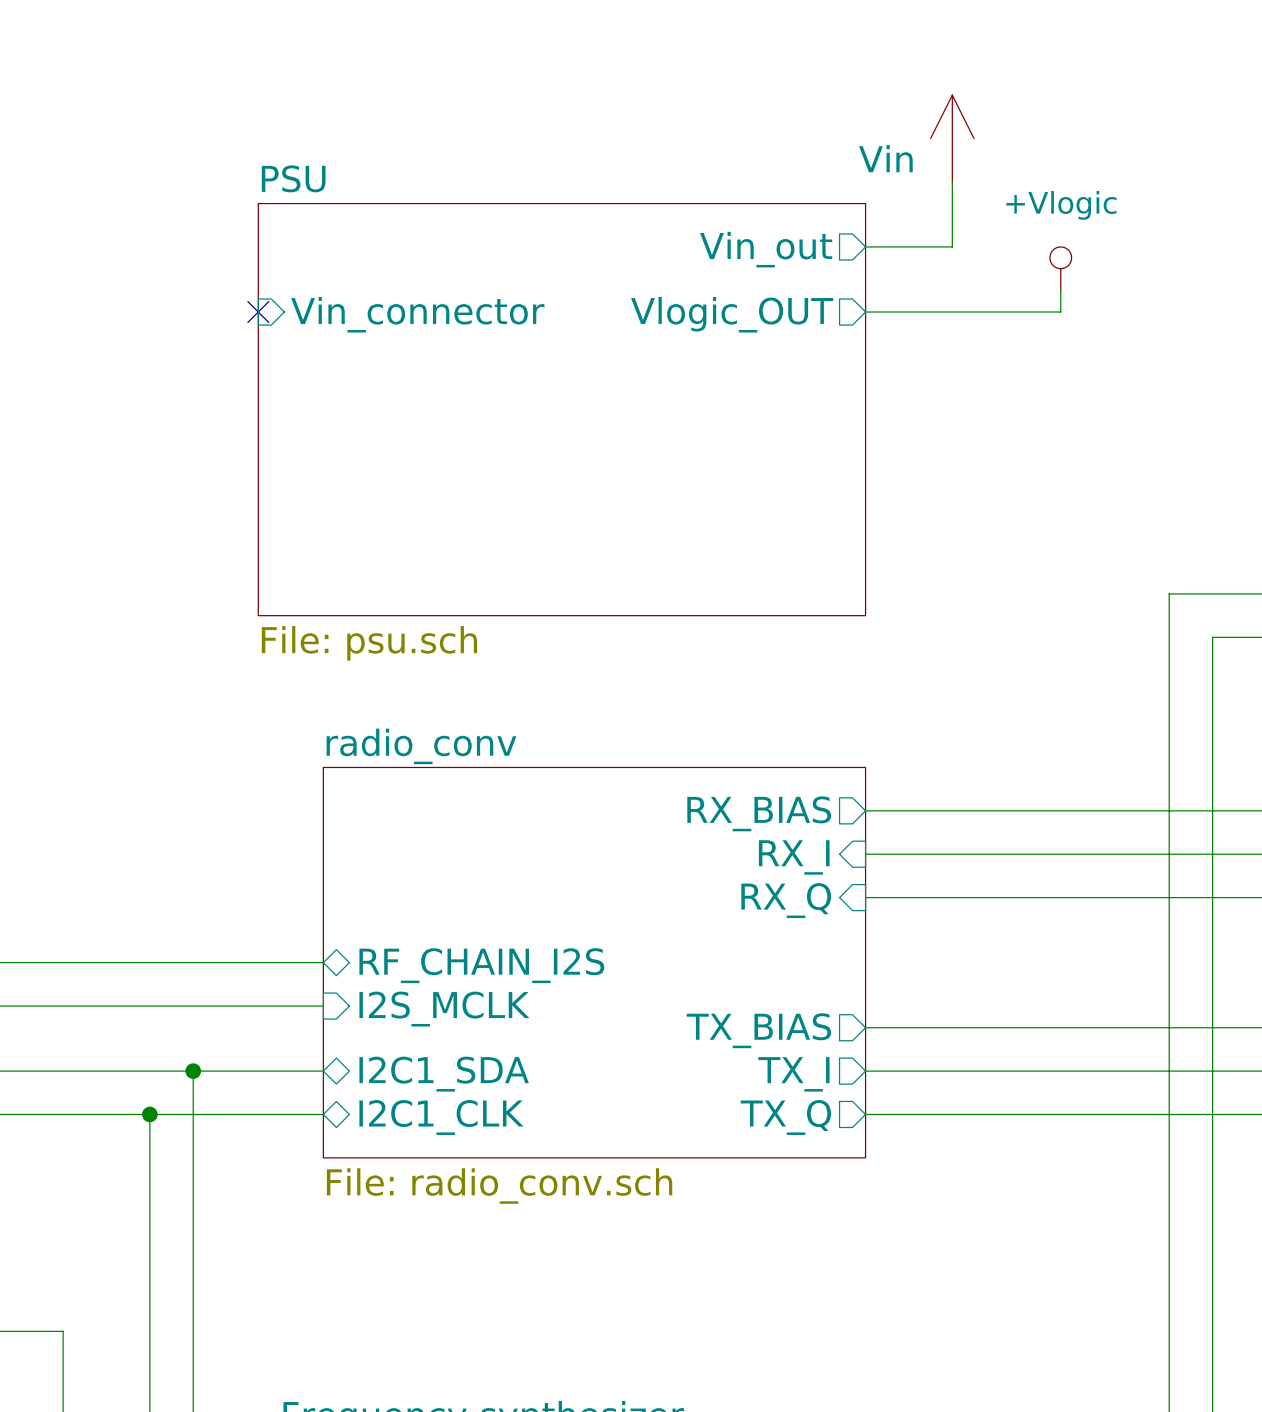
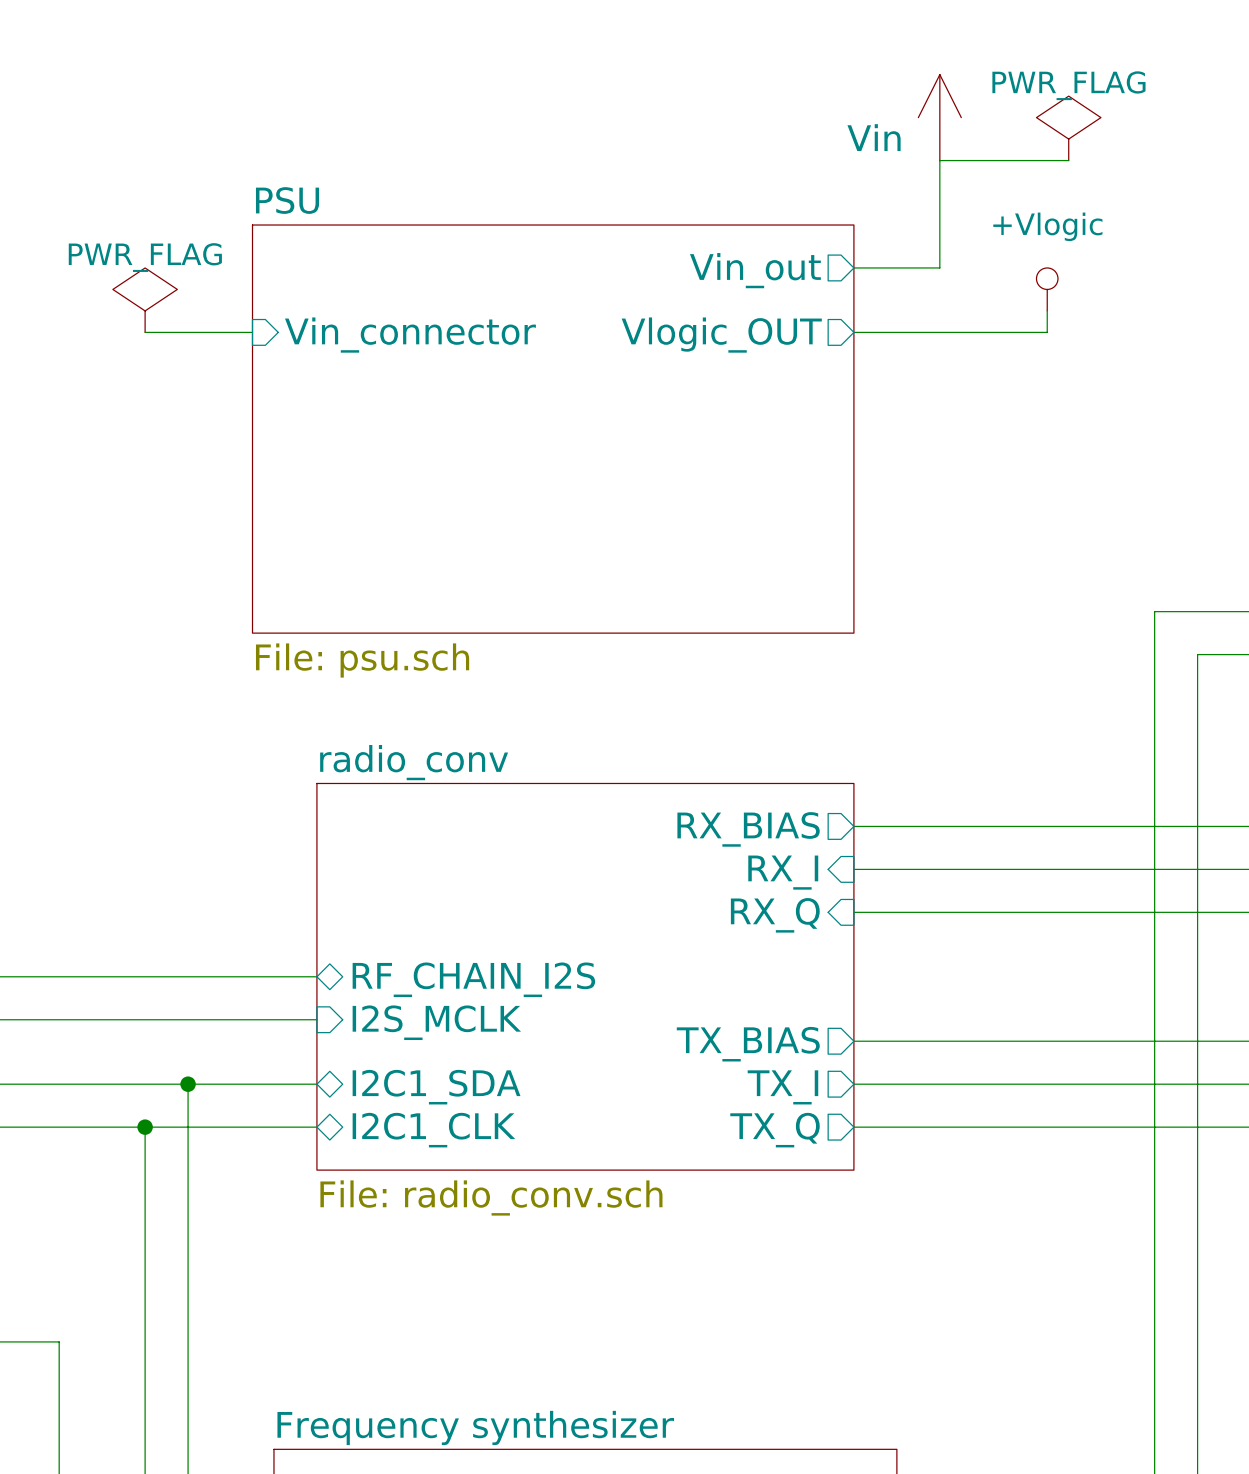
power symbol: none -> PWR_FLAG (1068, 128)
power symbol position: Vin (952, 138) -> Vin (939, 117)
wire: none -> (1068, 160) (939, 160) (939, 203)
power symbol: none -> PWR_FLAG (145, 300)
wire: none -> (145, 332) (252, 332)
no-connect mark: (258, 312) -> none

